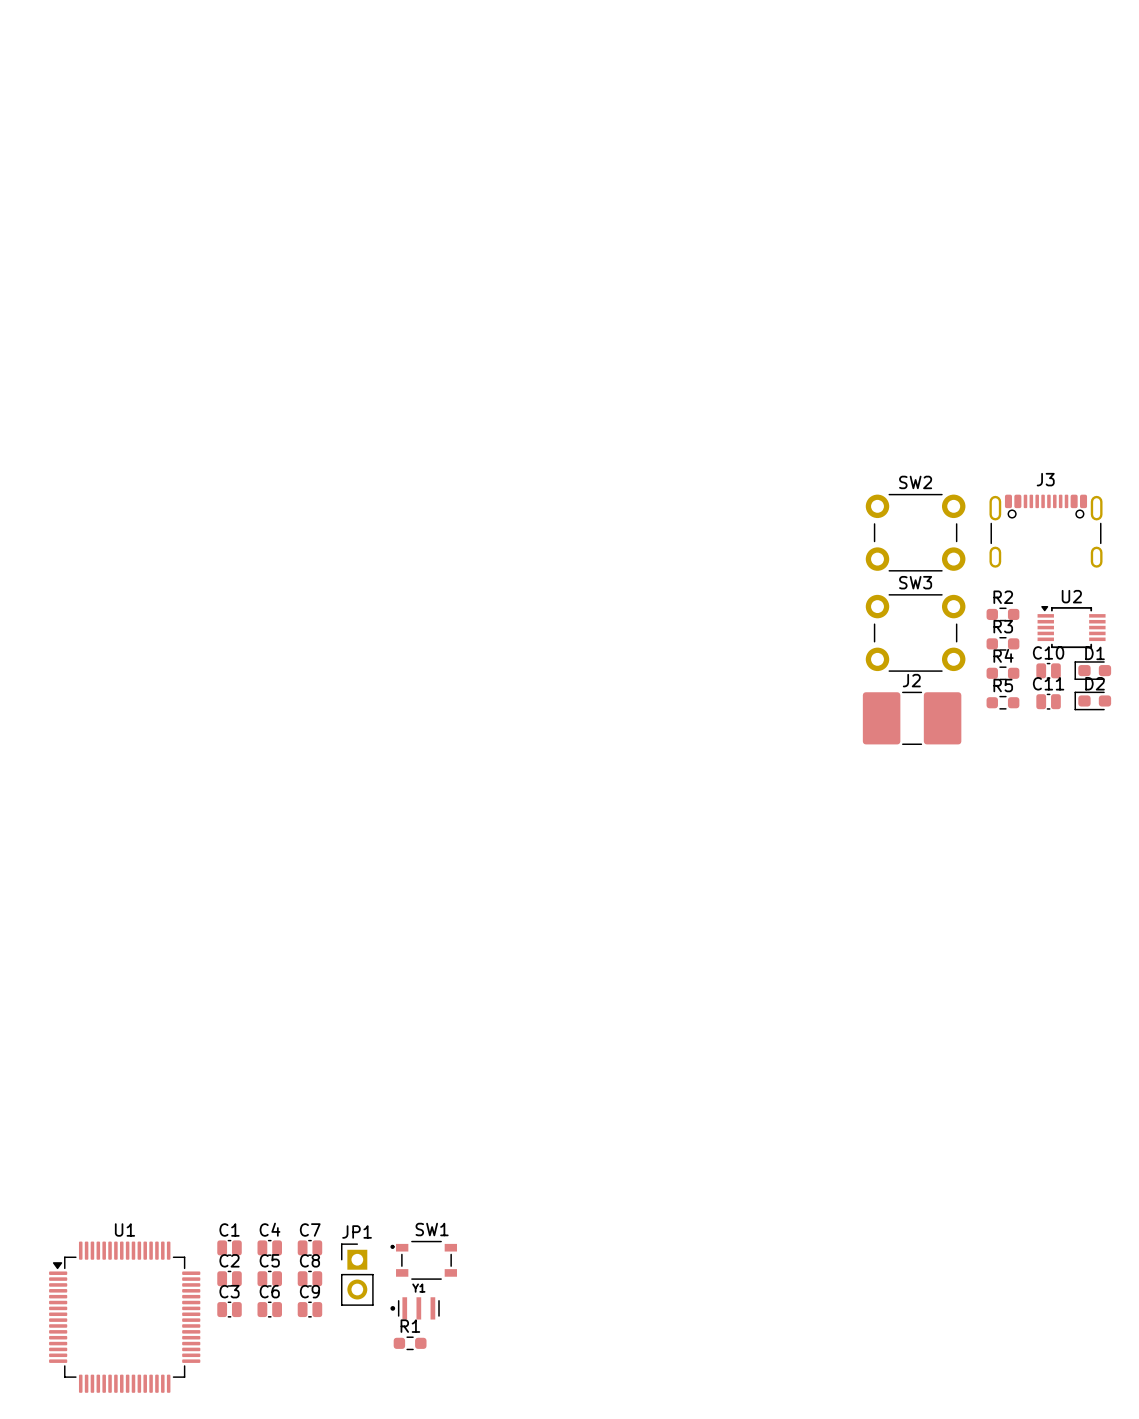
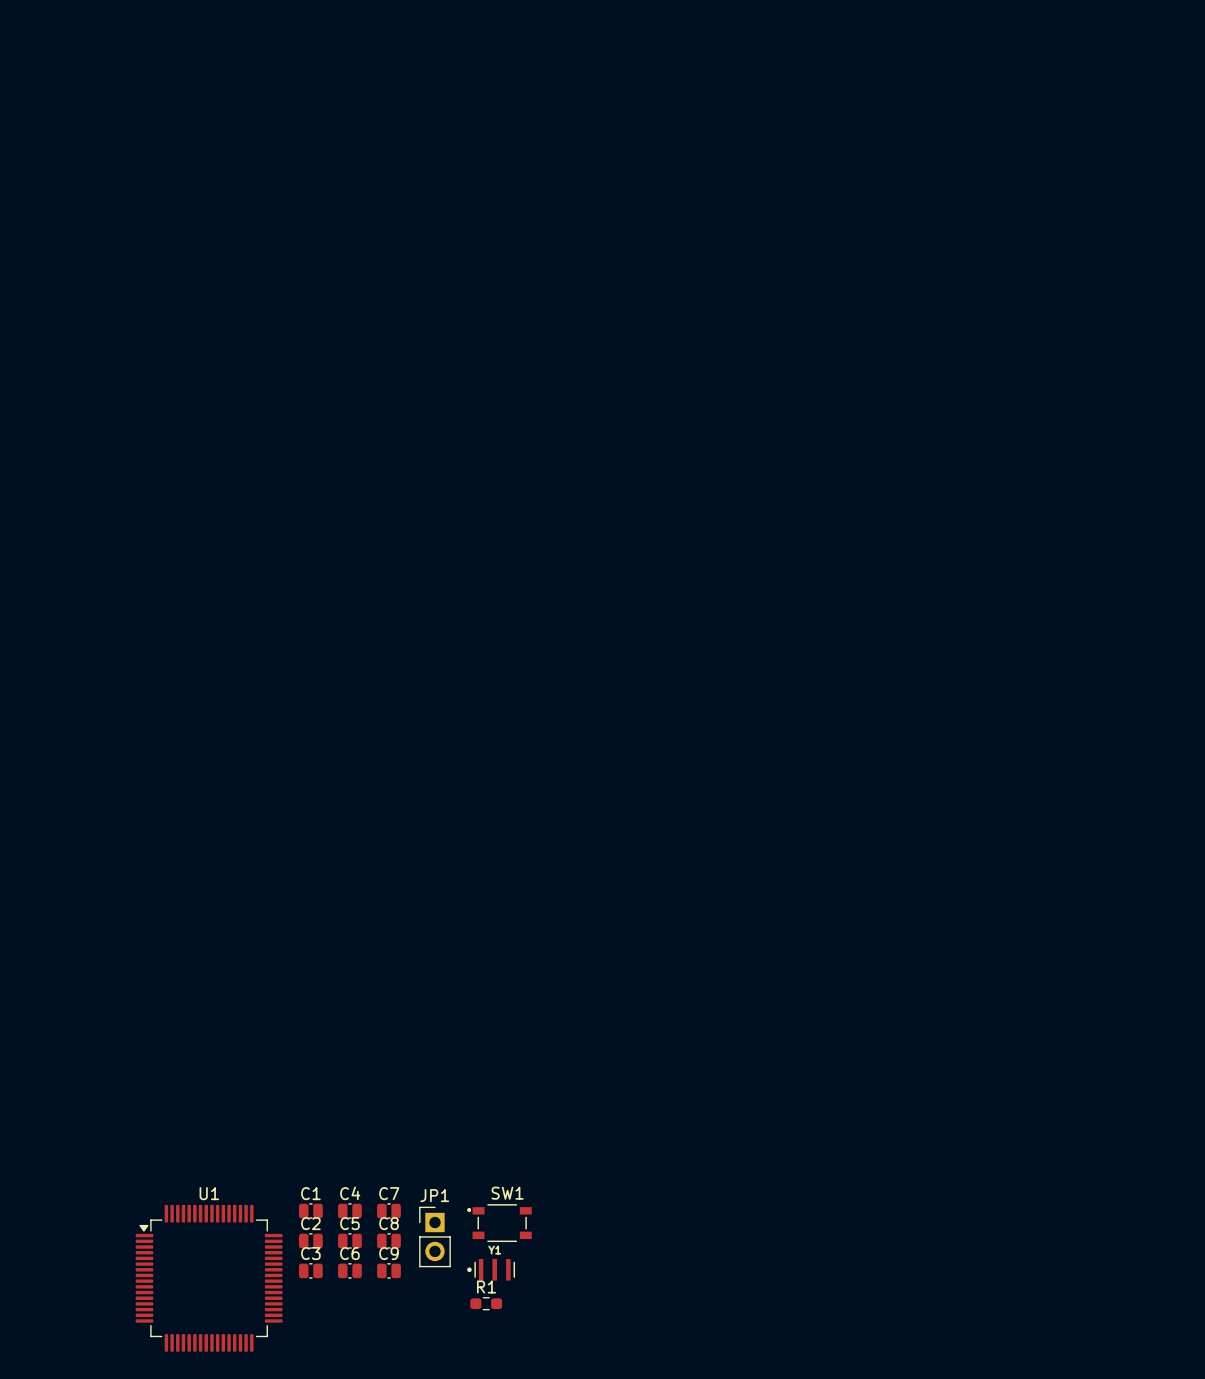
J3: (1045, 531) -> none
SW2: (915, 532) -> none
R2: (1002, 614) -> none
U2: (1071, 627) -> none
SW3: (915, 632) -> none
R3: (1002, 643) -> none
C10: (1048, 670) -> none
D1: (1092, 670) -> none
R4: (1002, 673) -> none
D2: (1092, 700) -> none
C11: (1048, 701) -> none
R5: (1002, 702) -> none
J2: (912, 718) -> none

